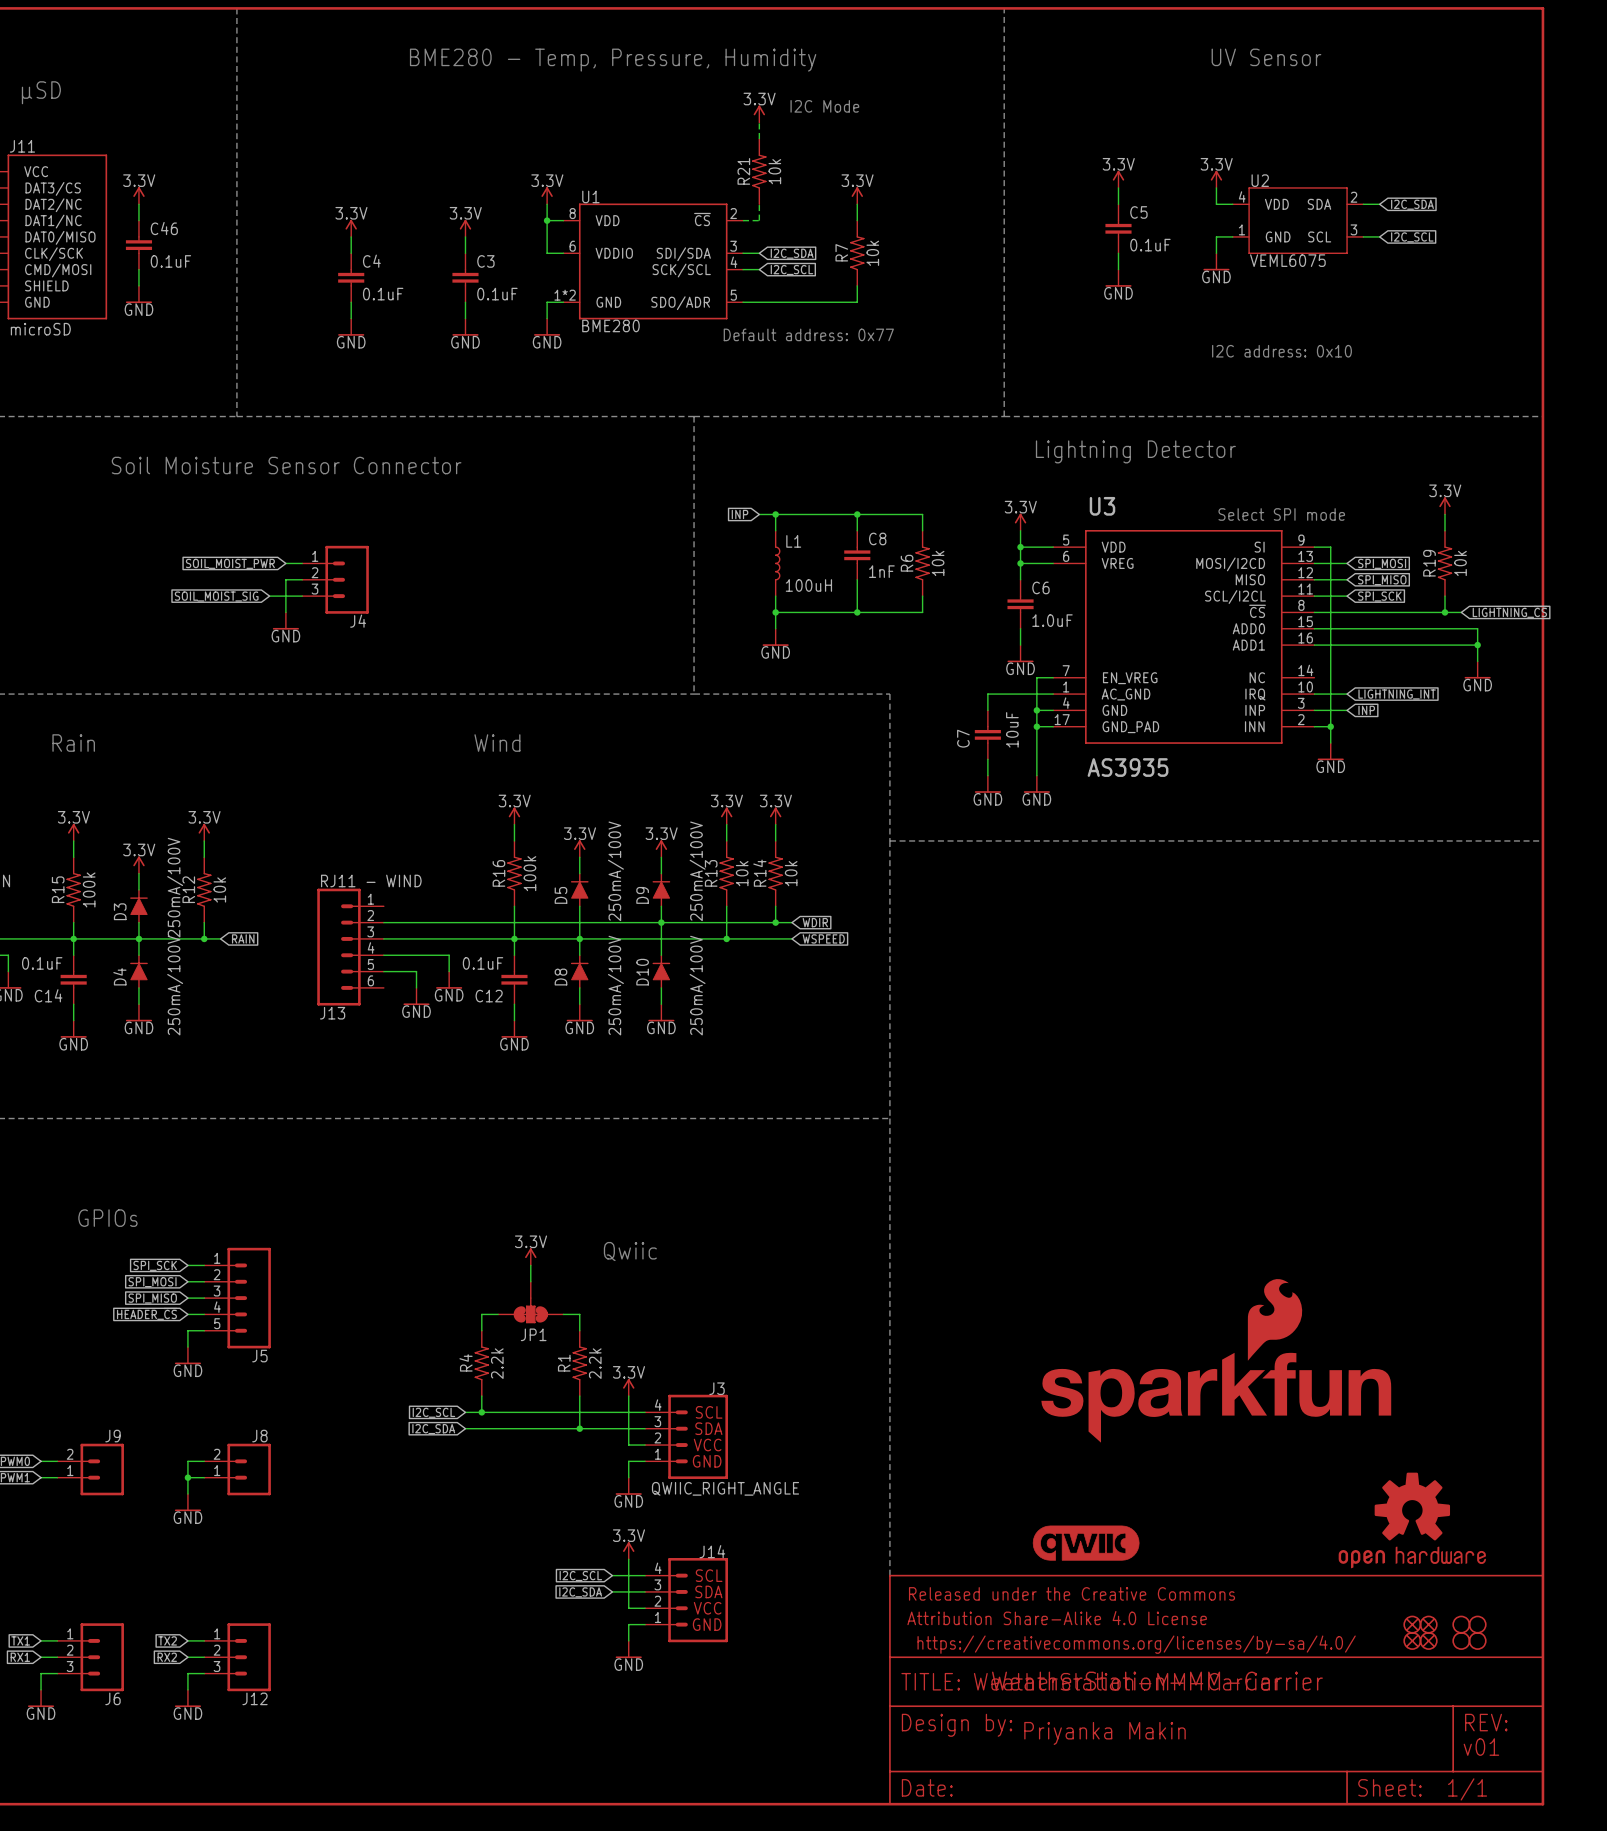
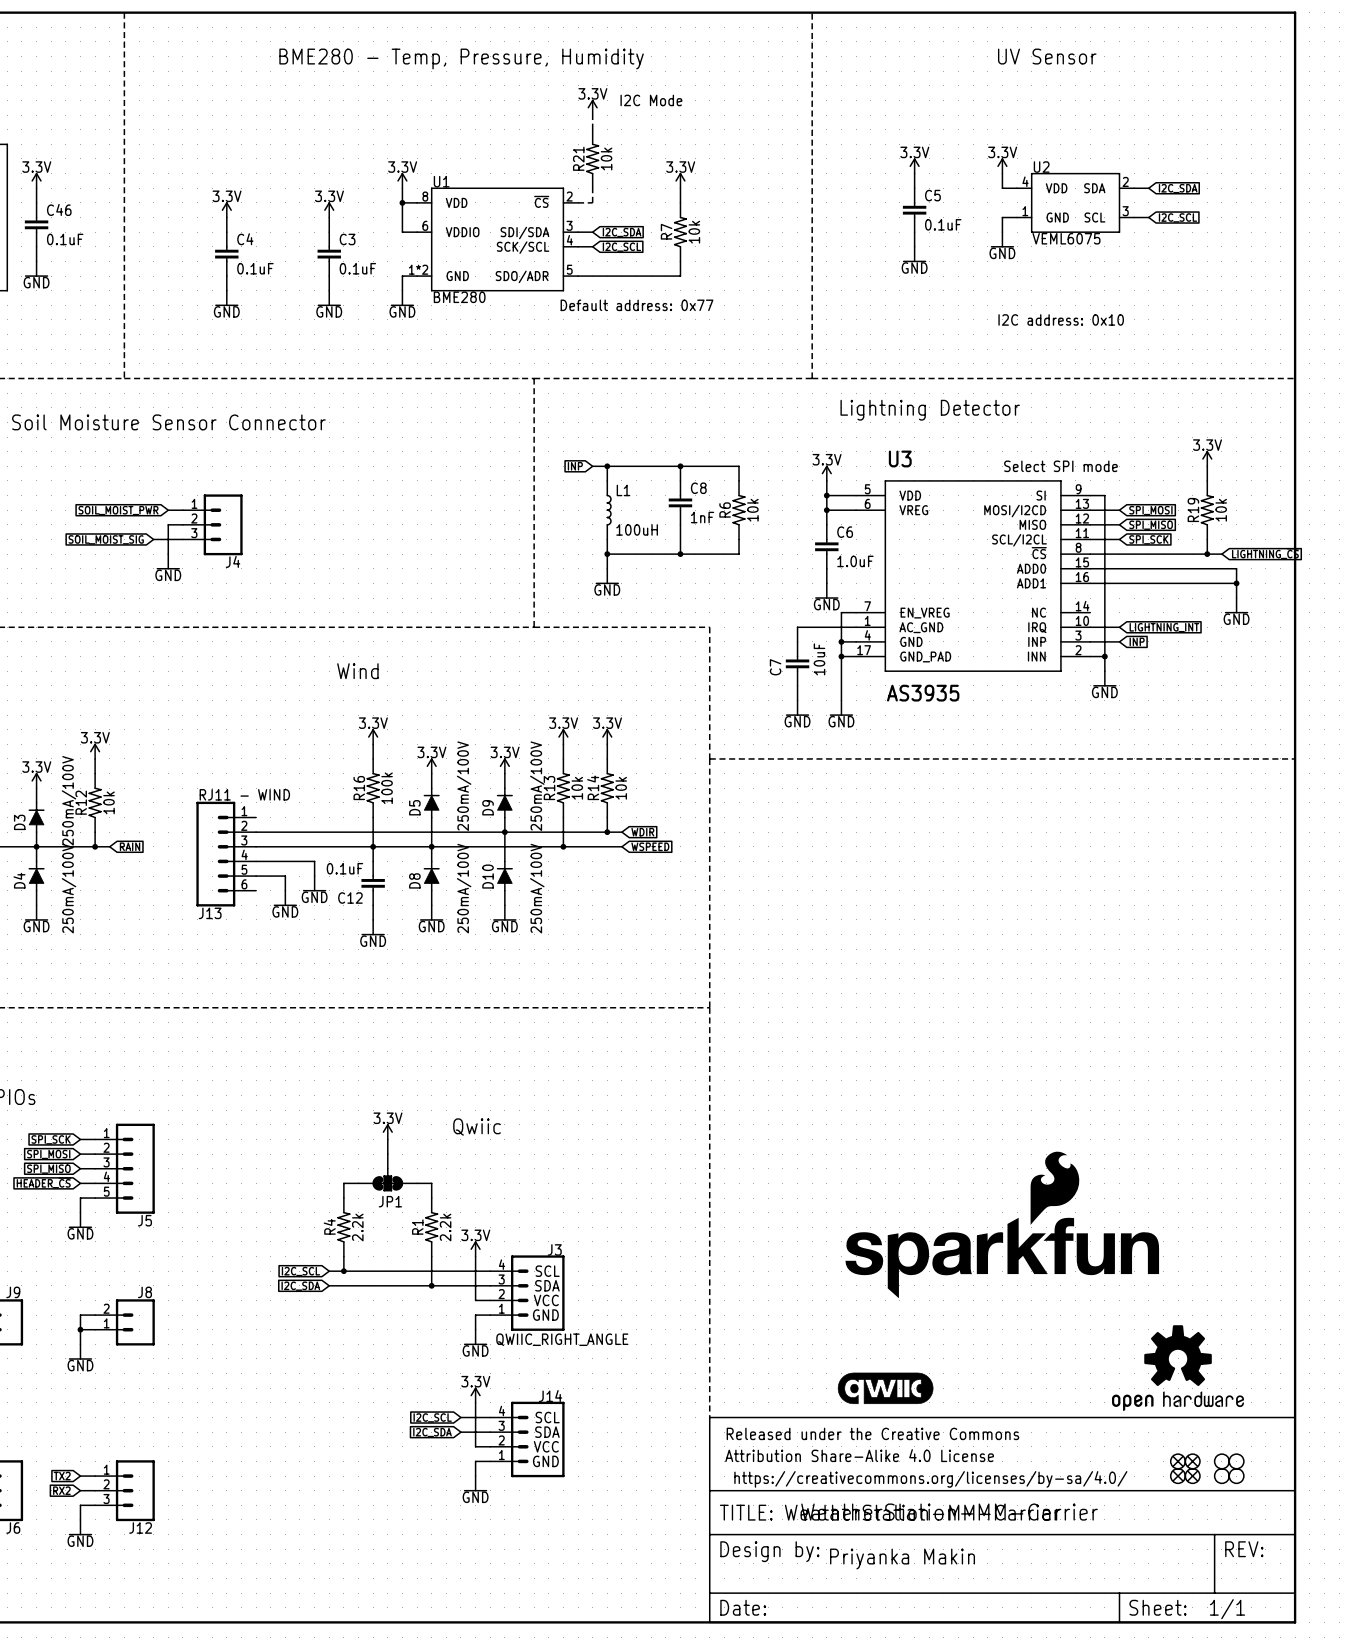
text: v01 (1481, 1747) -> none

